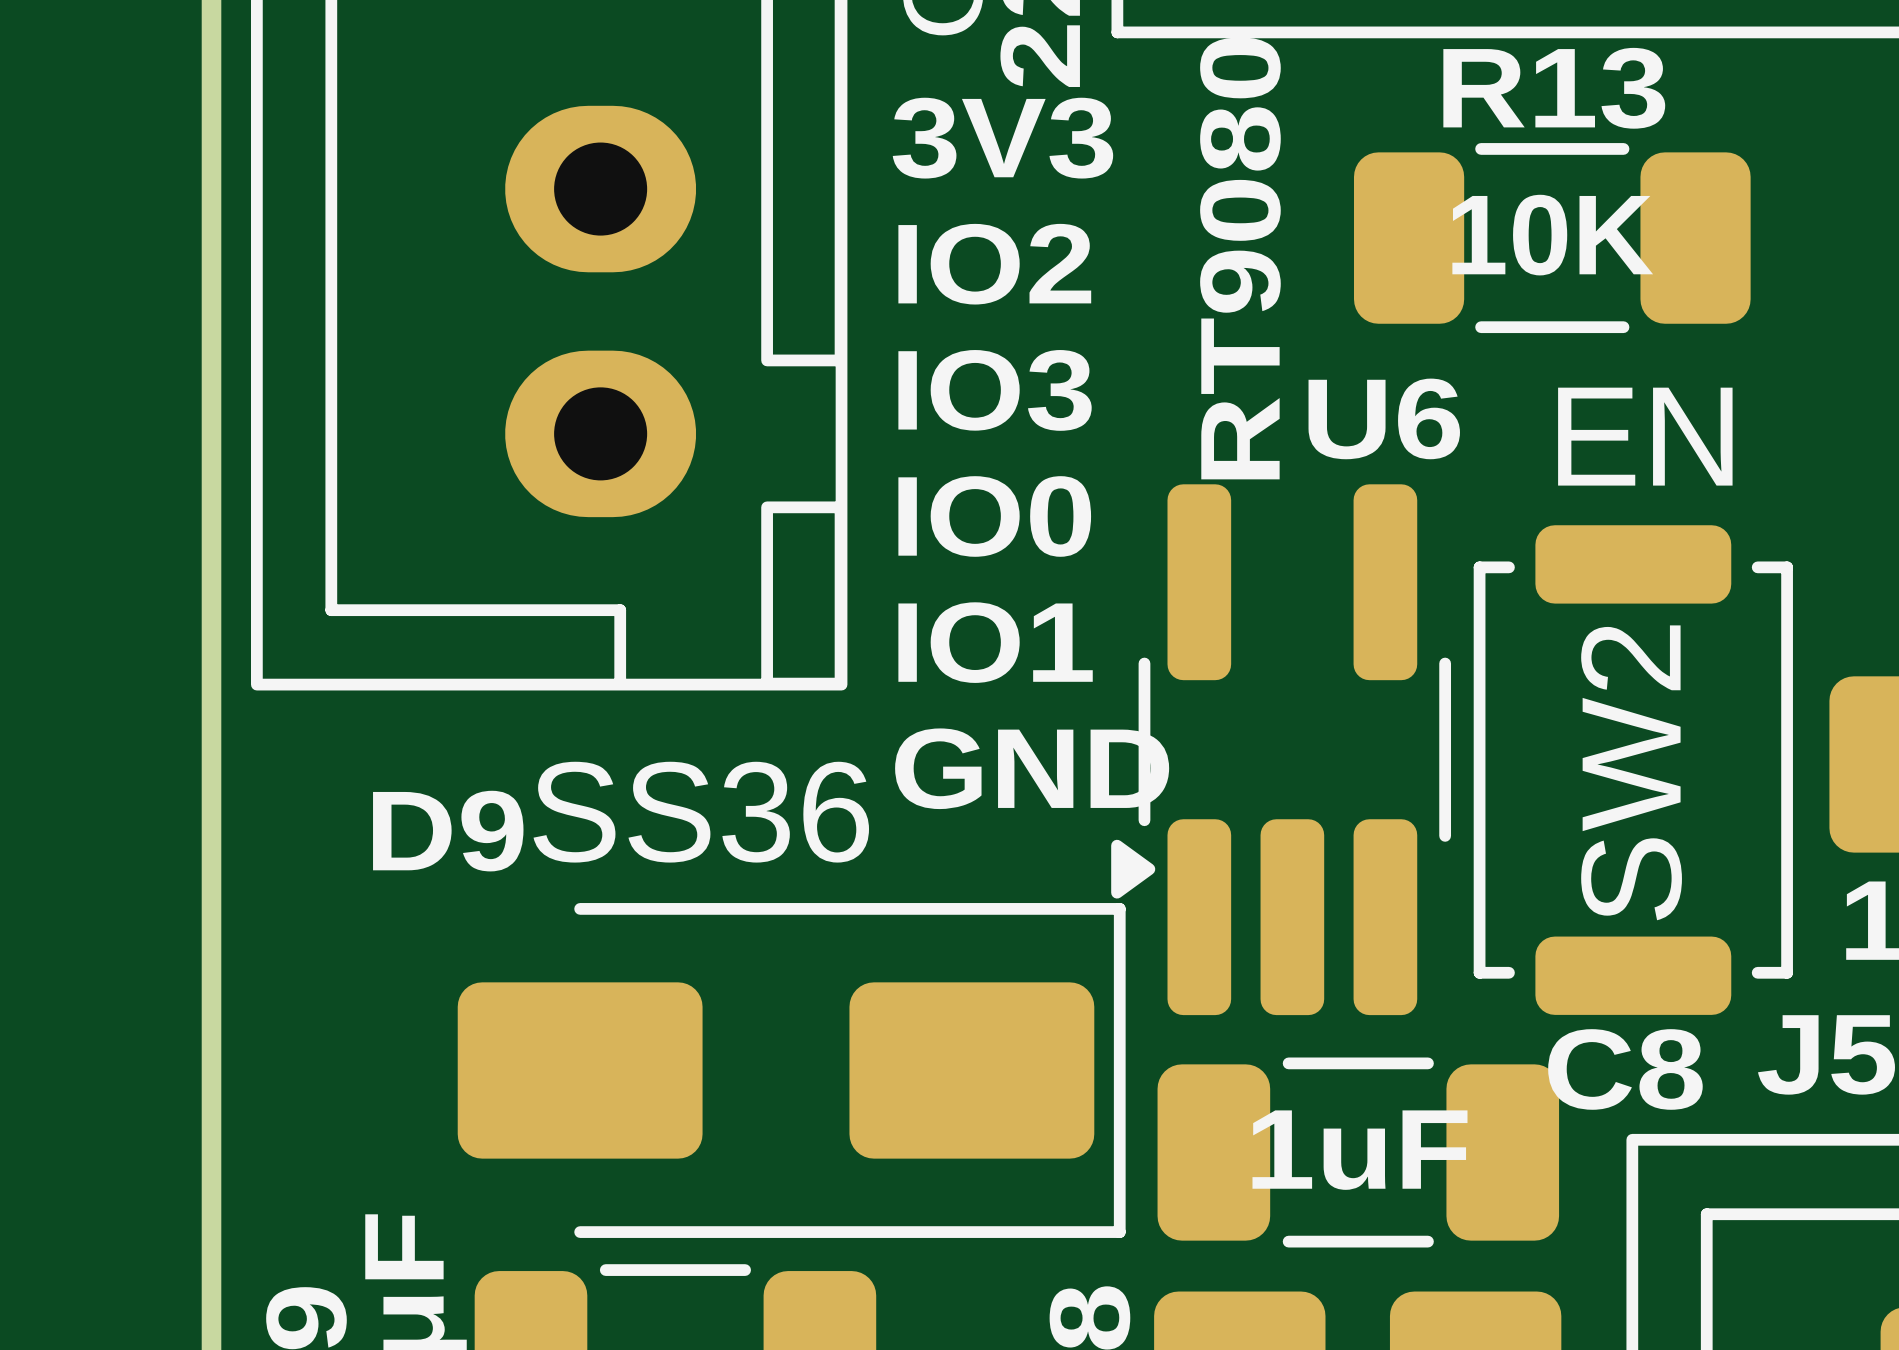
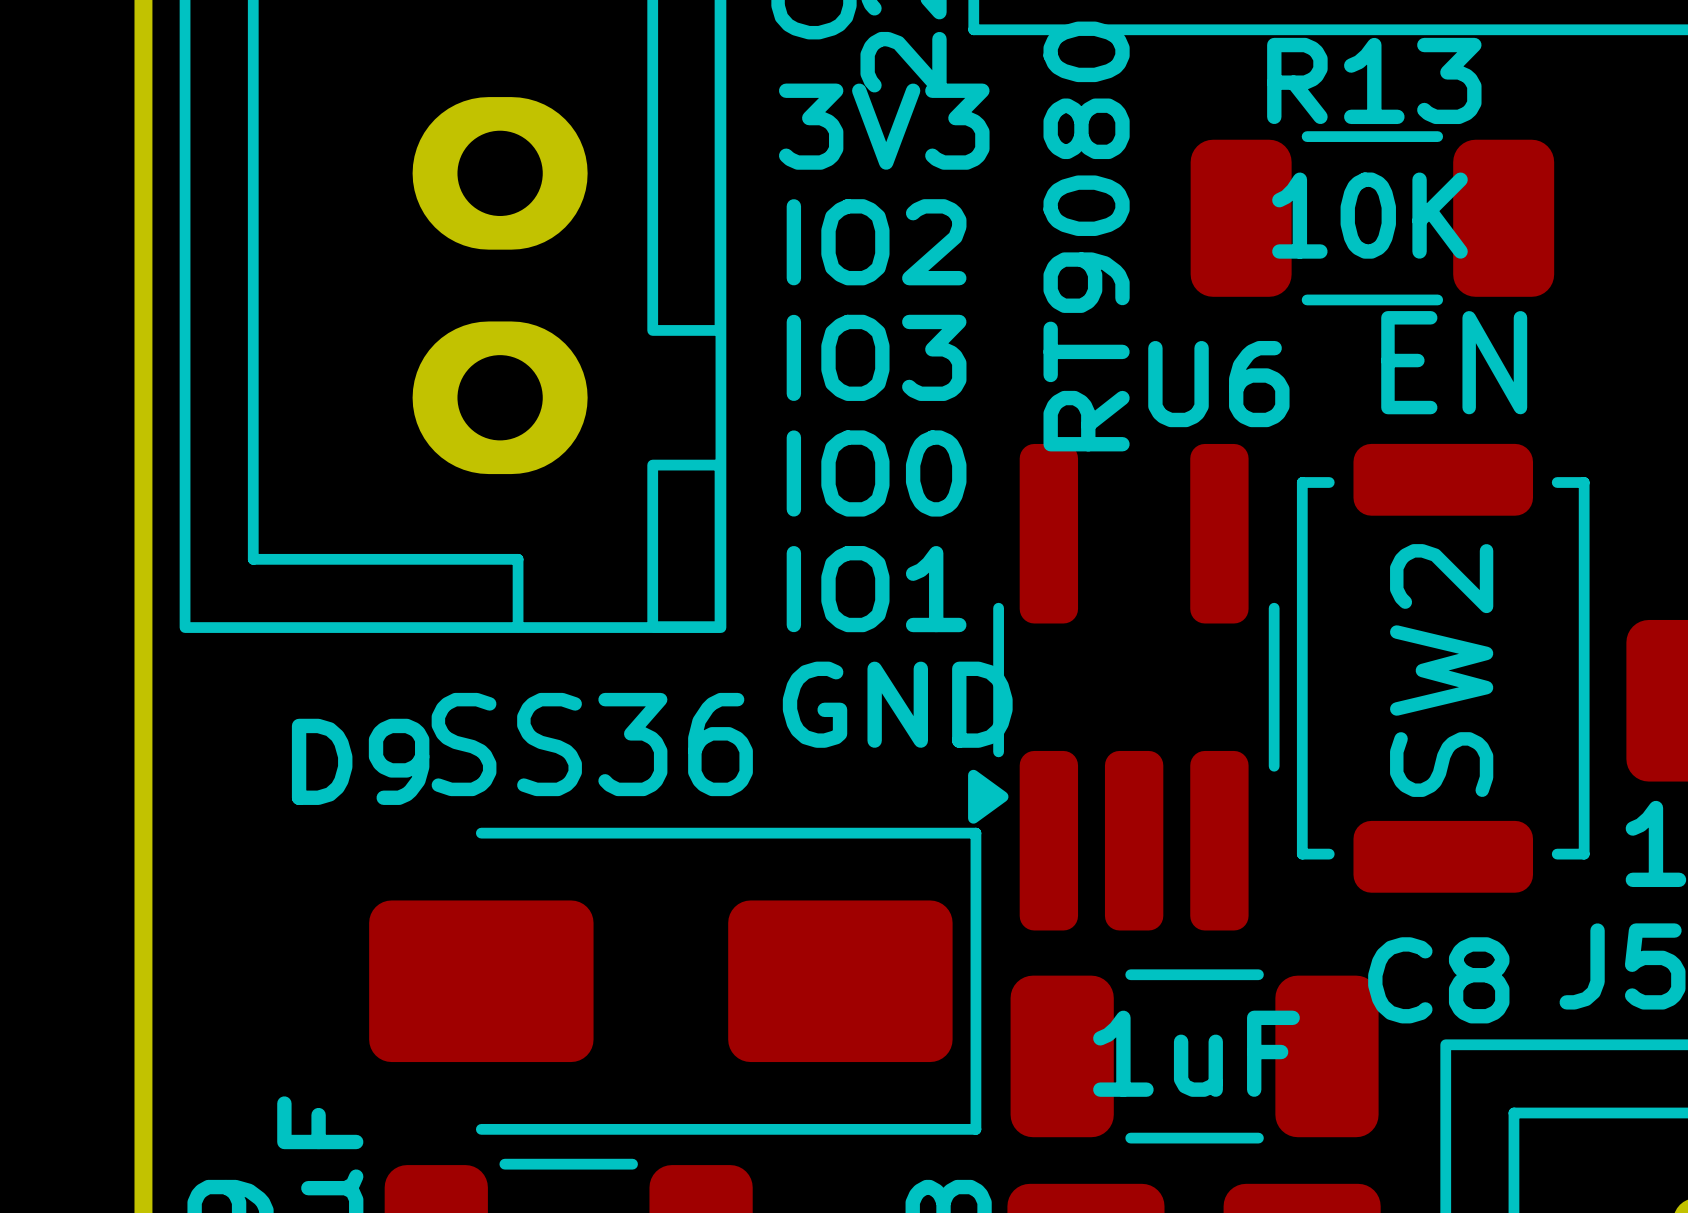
SW2 position: (1633, 770) -> (1443, 668)

